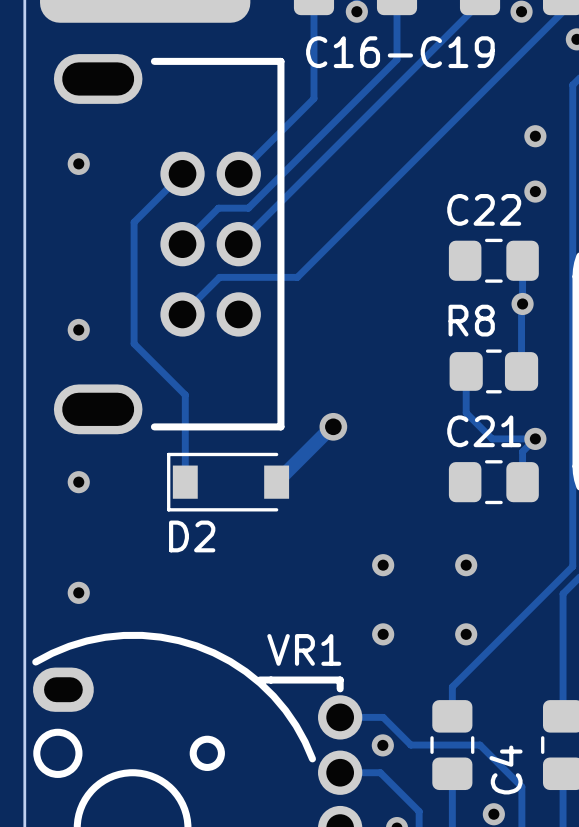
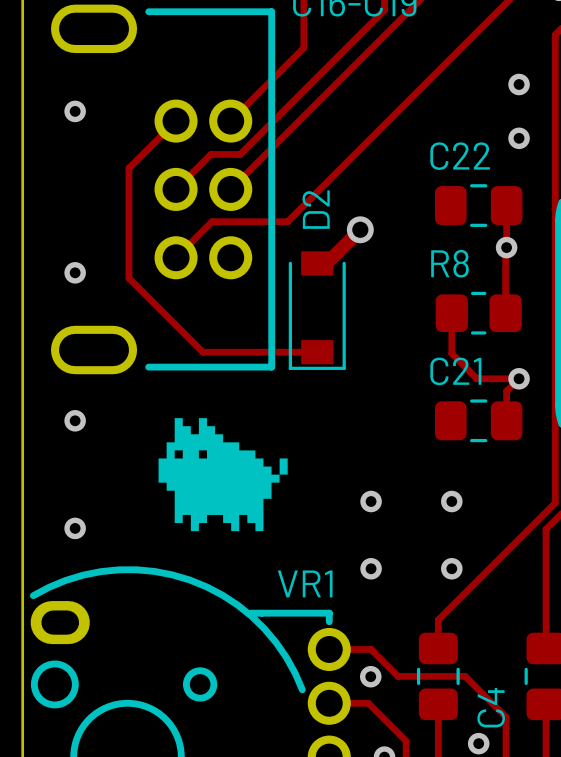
track: none -> (360, 229) (326, 263)
track: (134, 335) (134, 343) (185, 394) (185, 482) -> (128, 278) (202, 352) (317, 352)
track: (333, 426) (276, 482) -> none
via position: (333, 426) -> (360, 229)
drawing: none -> [158, 418, 288, 532]
D2 rotation: 0° (228, 482) -> 90° counterclockwise (317, 310)
D2 position: (228, 482) -> (317, 310)
D2 name position: D2 (192, 536) -> D2 (316, 209)

